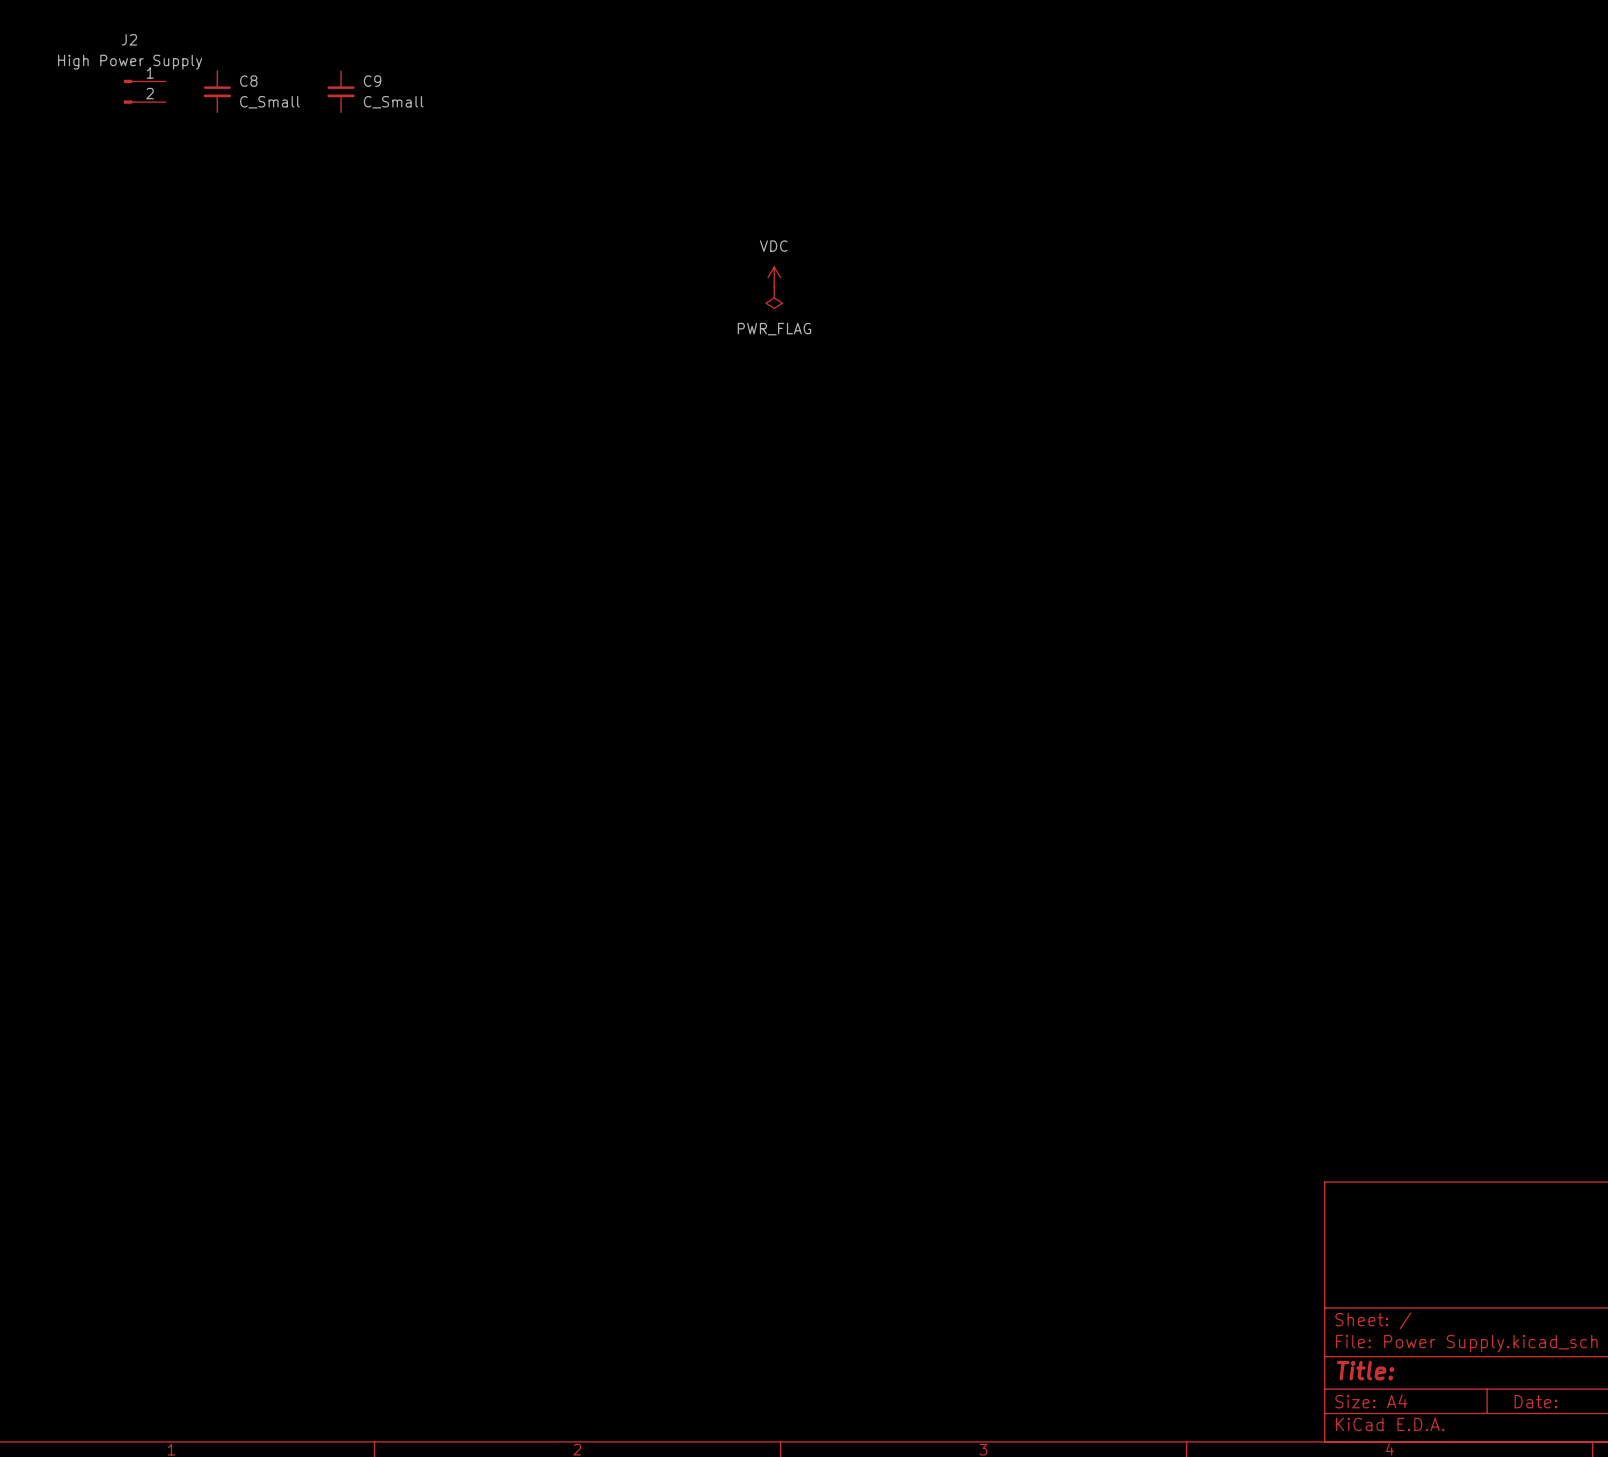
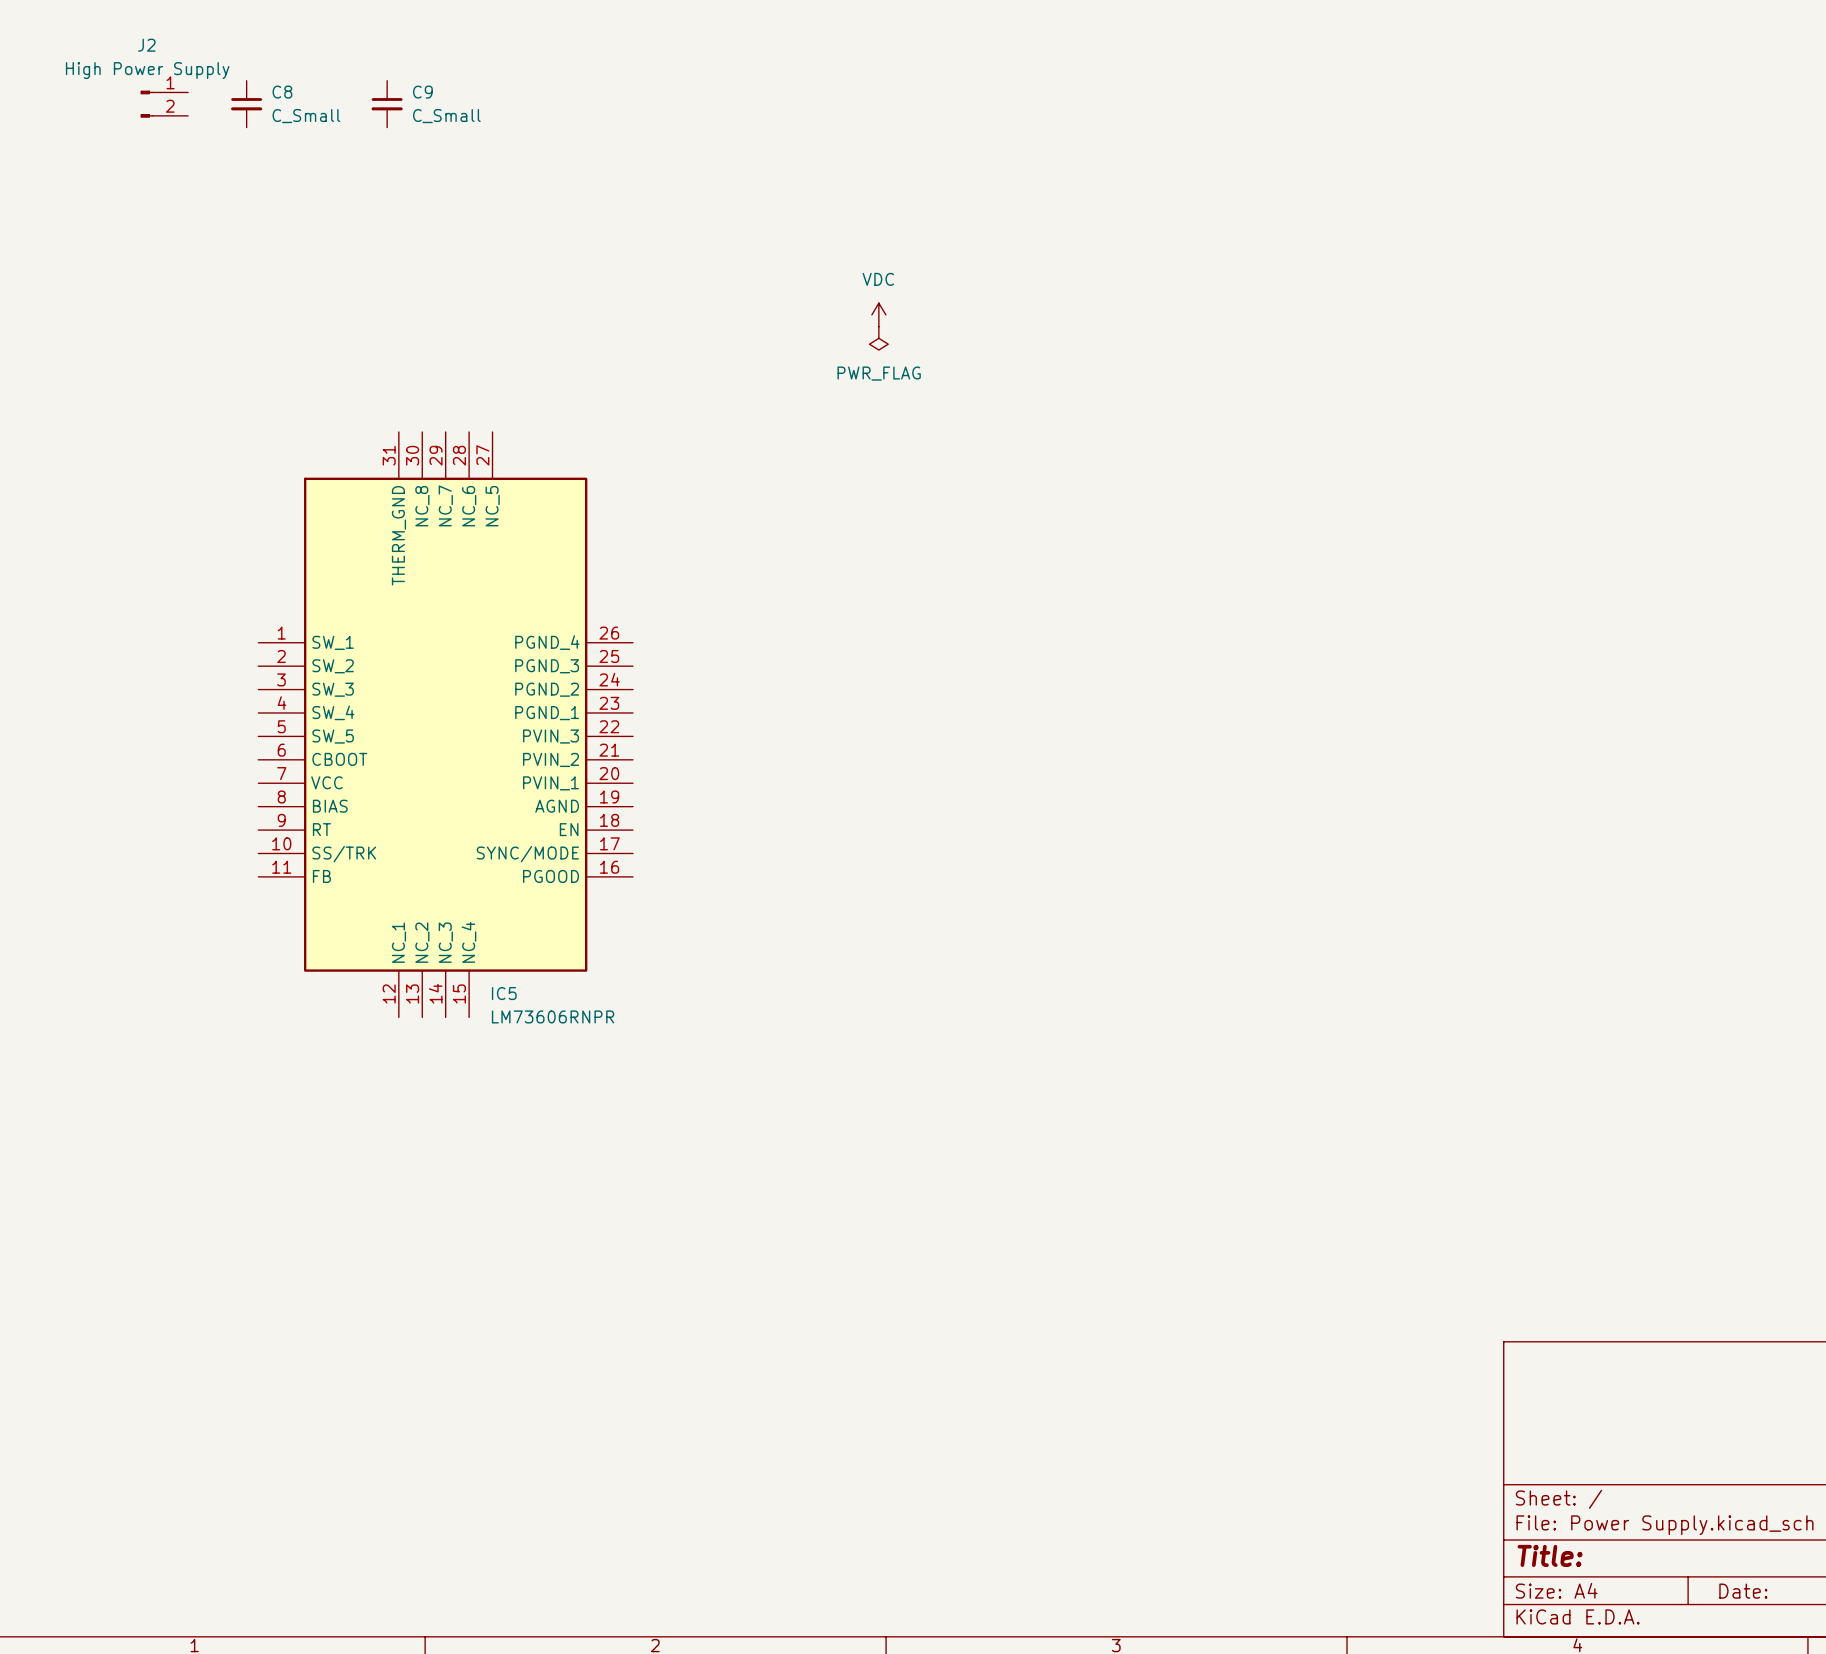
IC5: none -> LM73606RNPR (445, 724)

